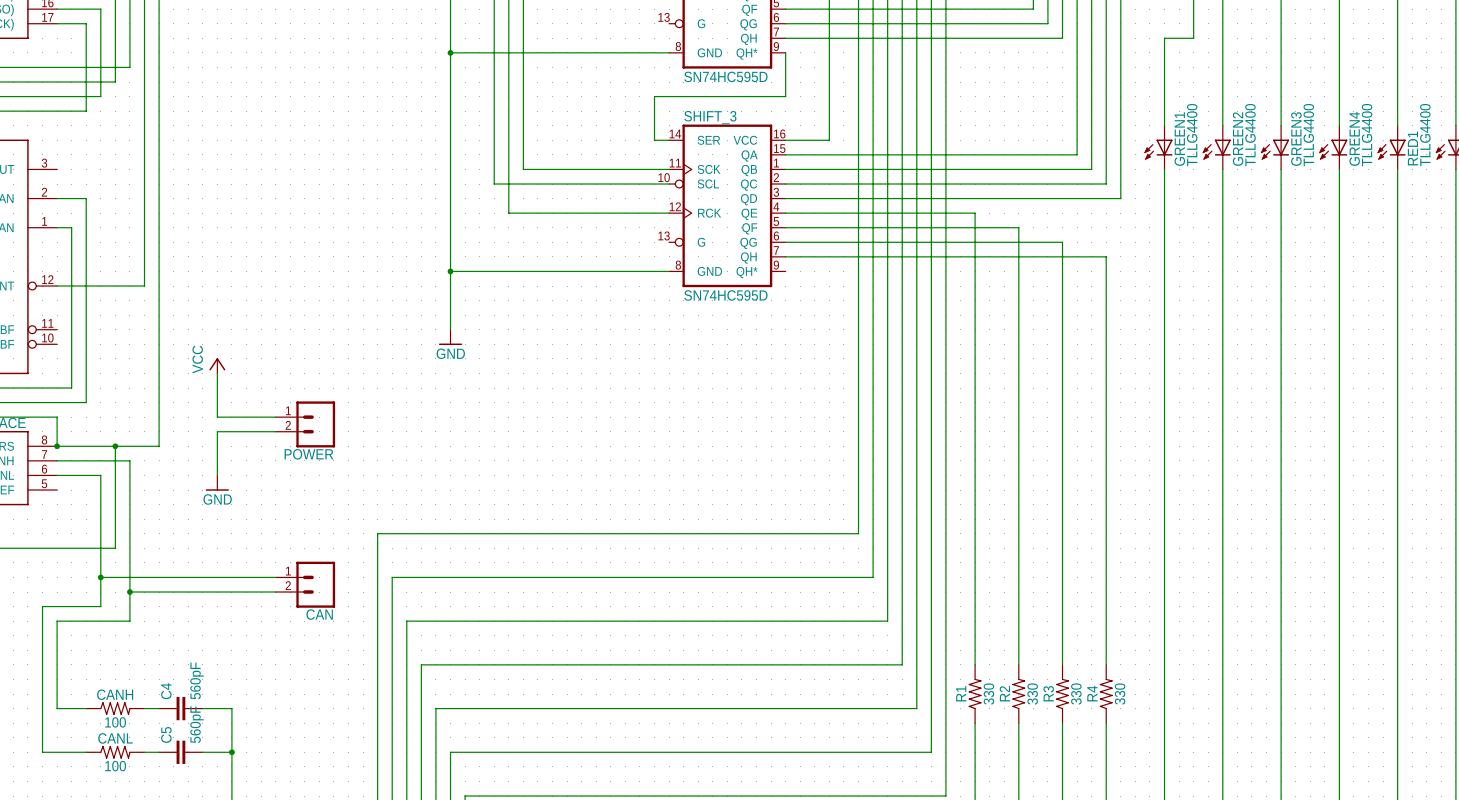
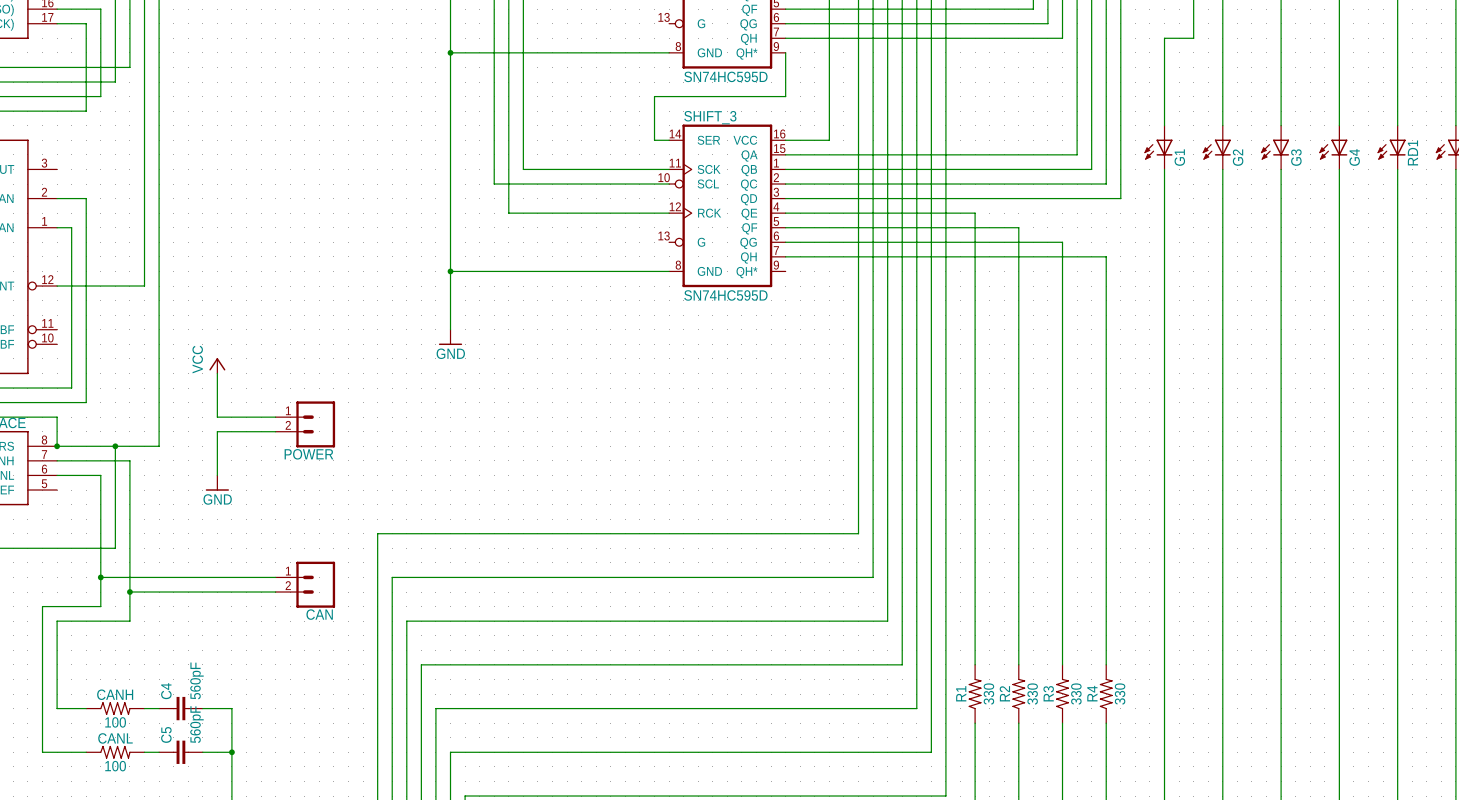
GREEN1 value: TLLG4400 (1192, 135) -> none
GREEN2 value: TLLG4400 (1250, 135) -> none
GREEN3 value: TLLG4400 (1308, 135) -> none
GREEN4 value: TLLG4400 (1367, 135) -> none
RED1 value: TLLG4400 (1425, 135) -> none
GREEN4 name: GREEN4 (1354, 138) -> G4 (1354, 157)
GREEN1 name: GREEN1 (1179, 139) -> G1 (1179, 157)
GREEN2 name: GREEN2 (1238, 139) -> G2 (1238, 157)
GREEN3 name: GREEN3 (1296, 139) -> G3 (1296, 157)
RED1 name: RED1 (1412, 148) -> RD1 (1412, 152)

